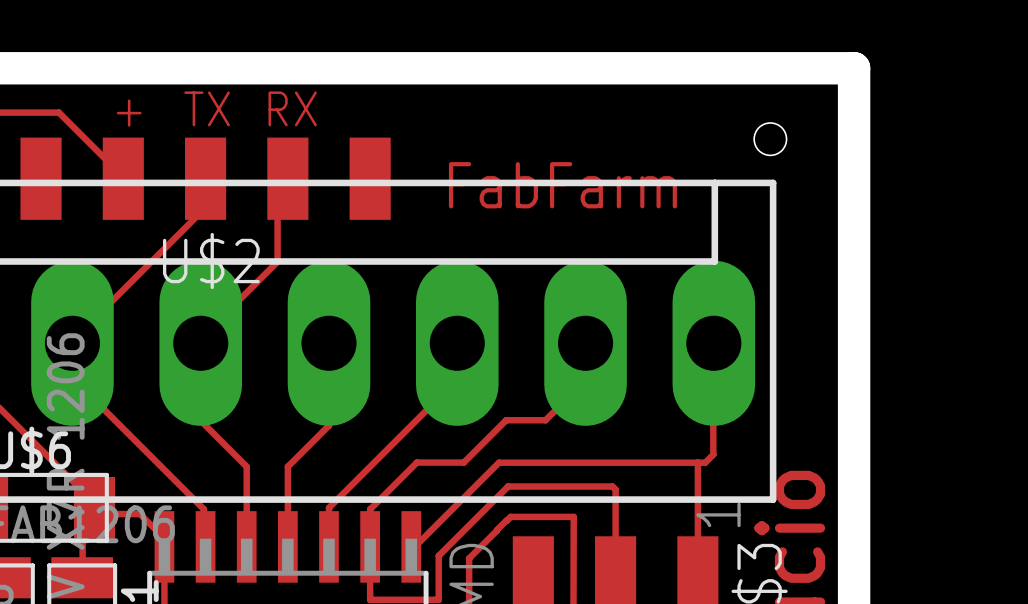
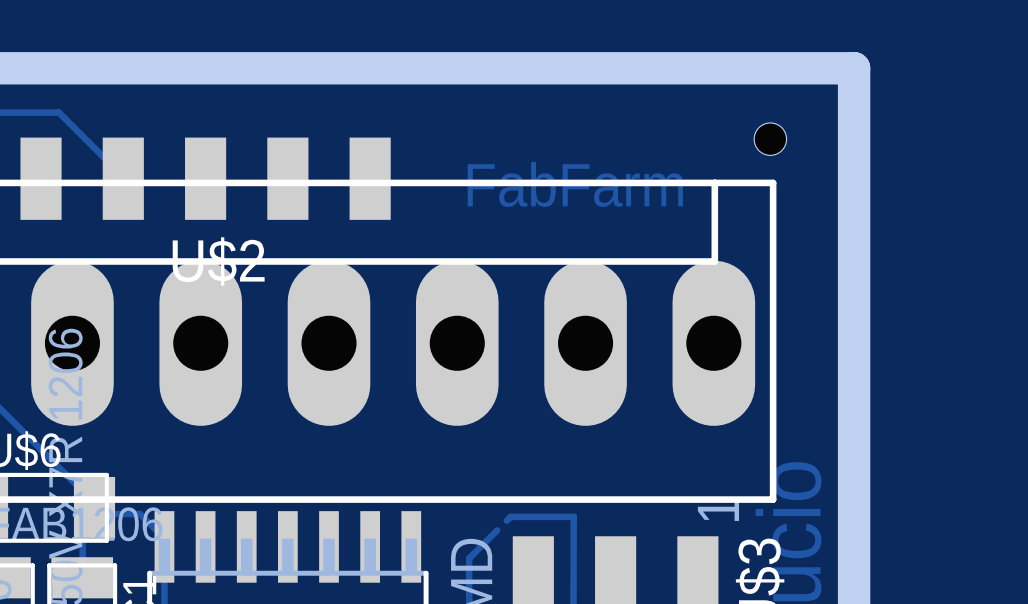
text: TX (207, 108) -> none
text: RX (292, 108) -> none
text: + (129, 113) -> none
track: (205, 178) (197, 181) (197, 215) (71, 342) (72, 377) (203, 509) (203, 545) (205, 546) -> none
track: (287, 178) (277, 181) (277, 261) (197, 342) (200, 343) (200, 420) (246, 466) (246, 546) -> none
track: (329, 343) (329, 425) (287, 466) (287, 546) -> none
track: (457, 343) (457, 379) (329, 507) (329, 546) -> none
track: (585, 343) (585, 380) (545, 420) (506, 420) (463, 462) (416, 462) (370, 509) (370, 599) (438, 599) (438, 555) (508, 486) (612, 486) (615, 489) (615, 577) -> none
track: (713, 343) (713, 454) (705, 462) (498, 462) (414, 546) (411, 546) -> none
track: (697, 462) (697, 577) -> none
track: (506, 520) (497, 529) -> none

